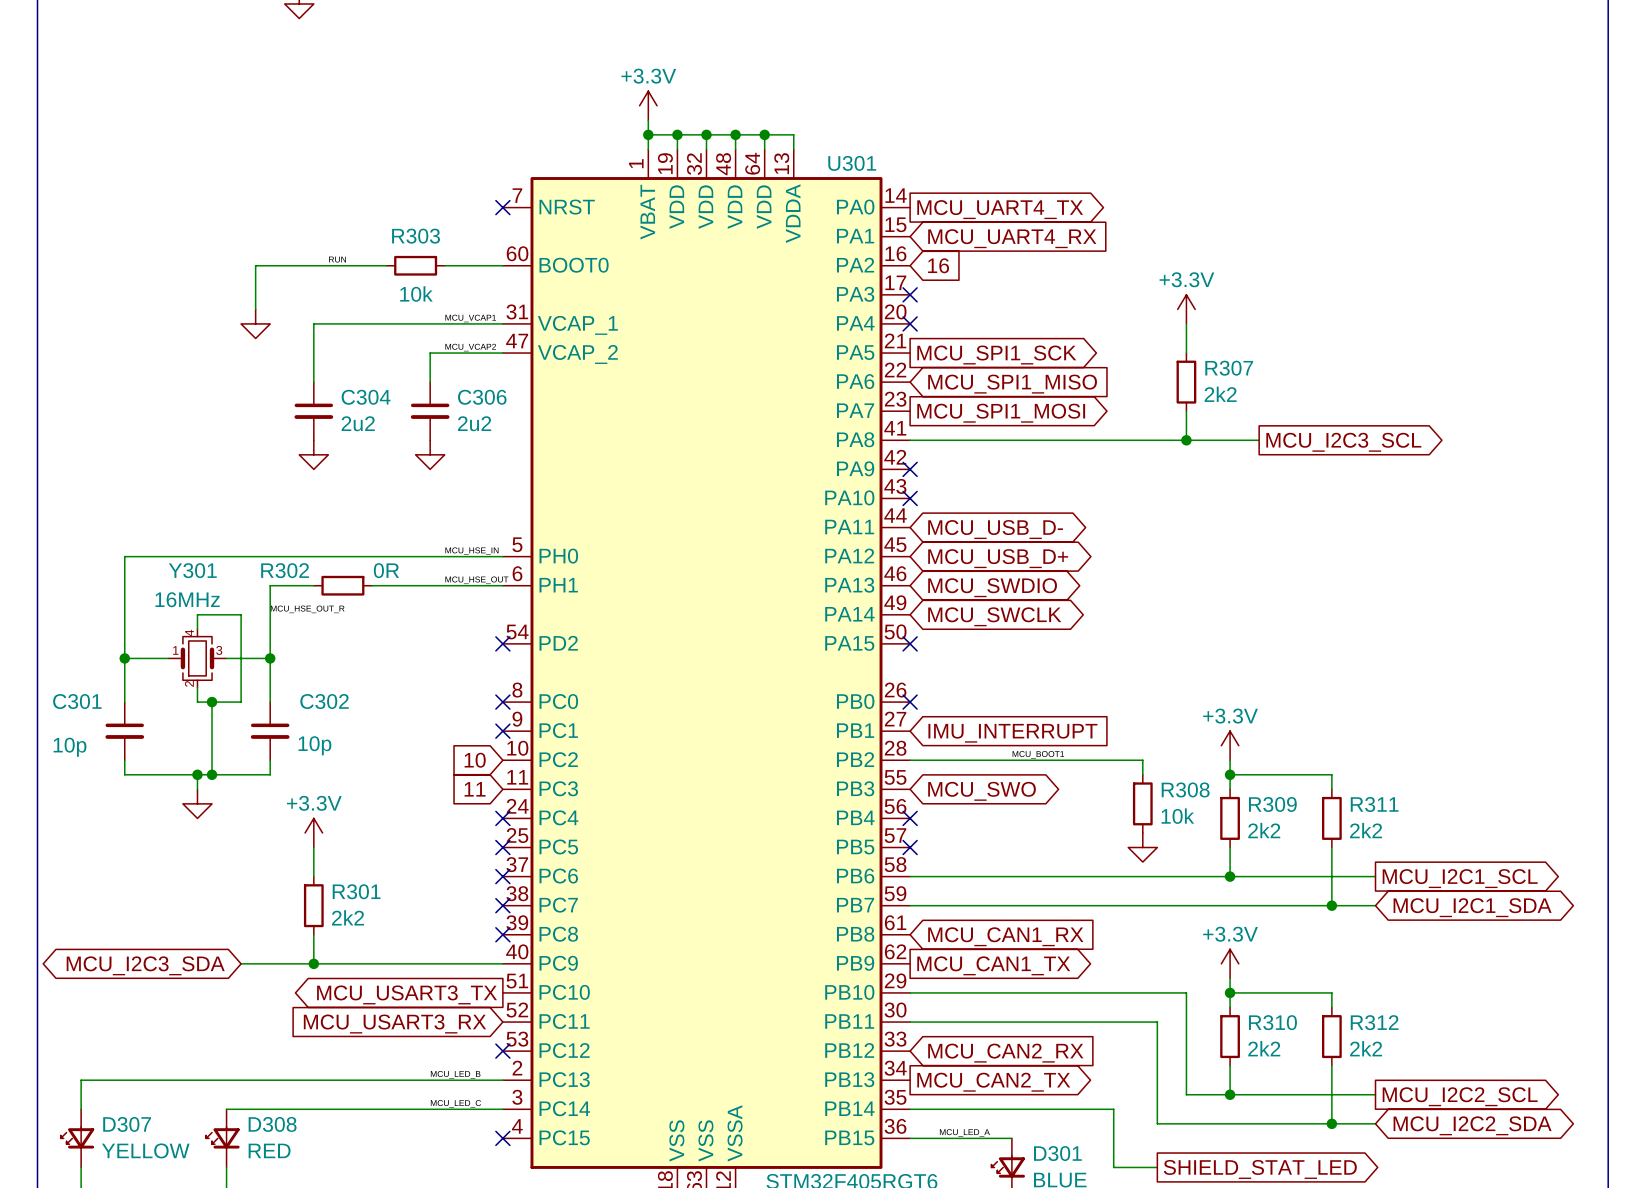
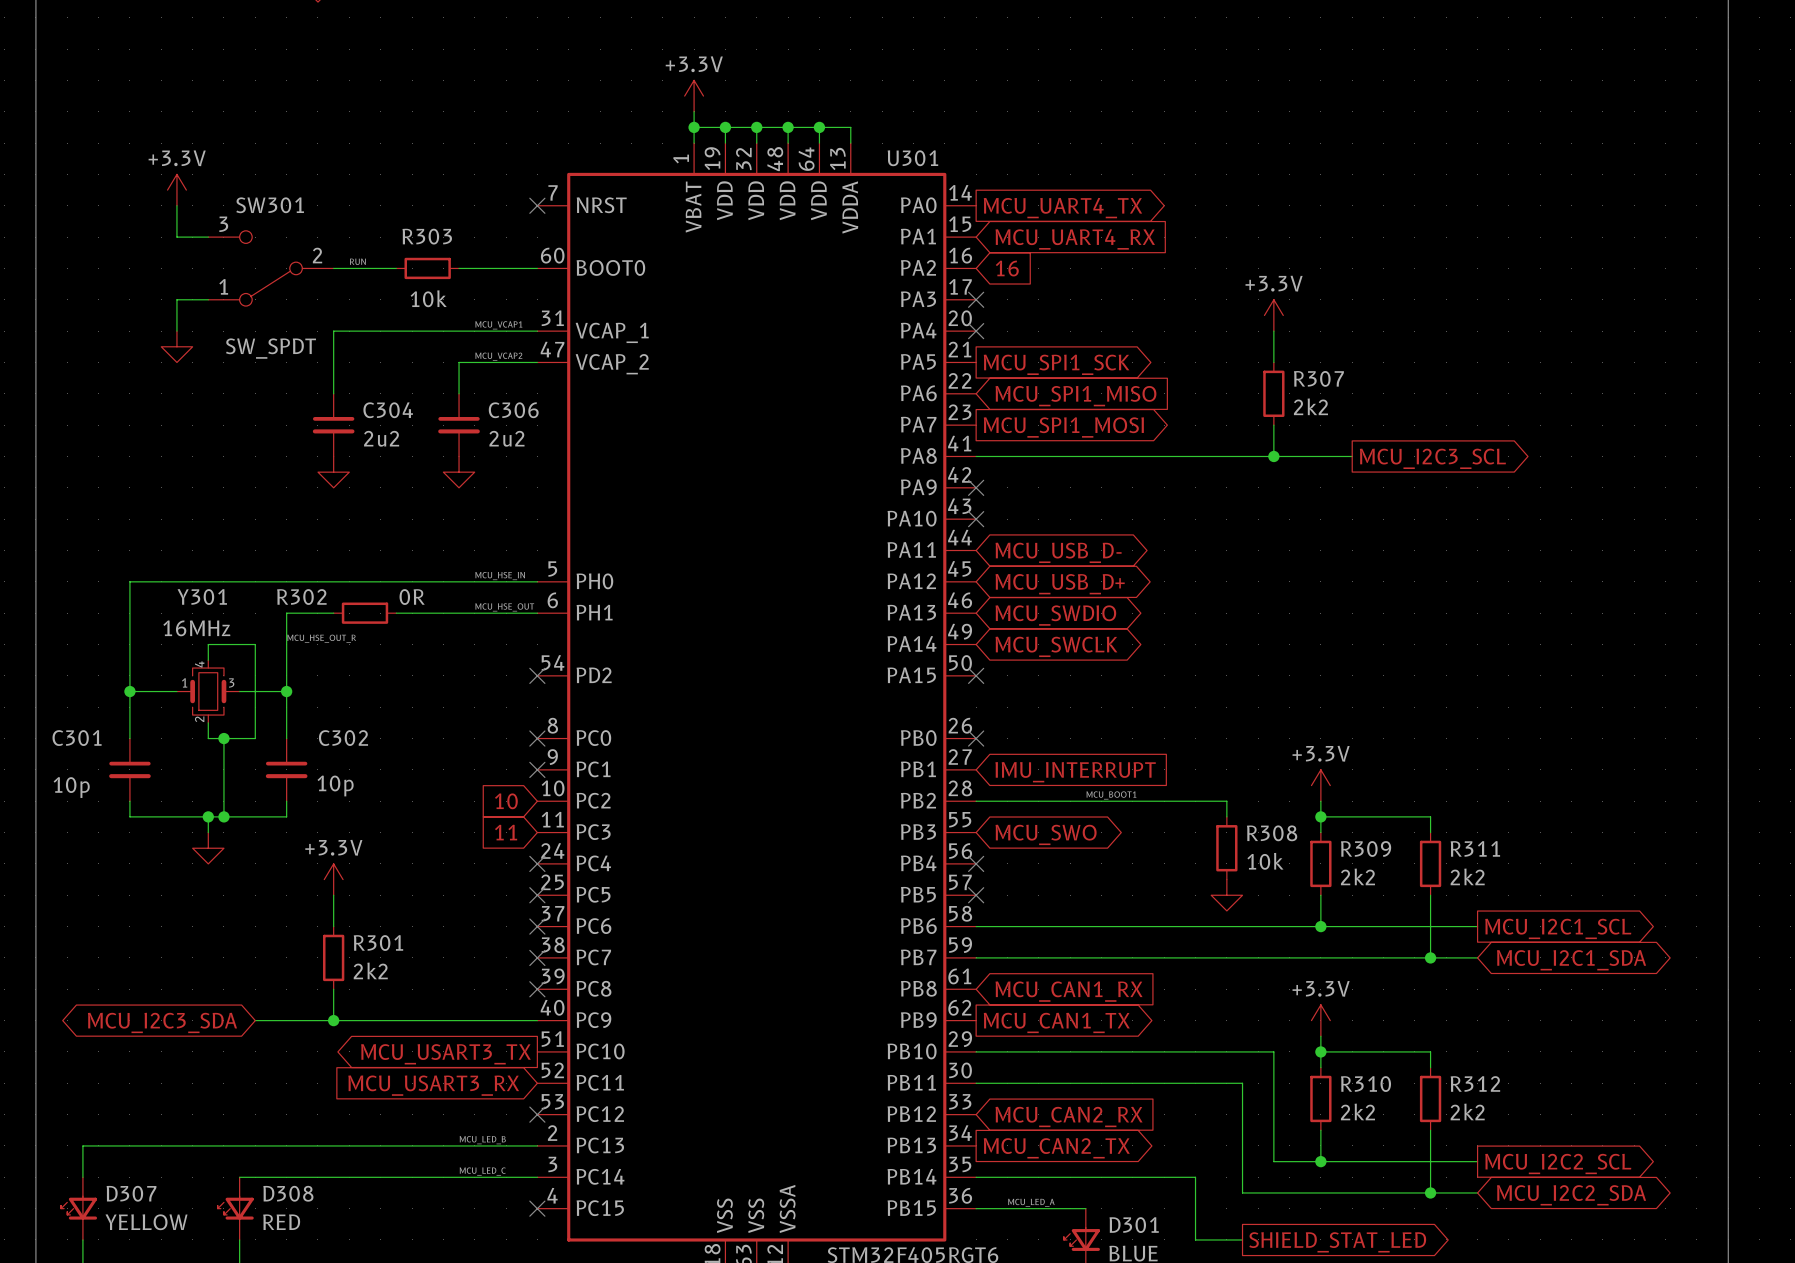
power symbol: none -> +3.3V (176, 190)
wire: none -> (176, 205) (176, 237) (208, 237)
SW301: none -> SW_SPDT (270, 268)
wire: (313, 265) (255, 265) (255, 309) -> none
R303 position: (415, 265) -> (427, 268)
wire: none -> (208, 299) (176, 299) (176, 331)
power symbol position: (255, 323) -> (176, 346)

